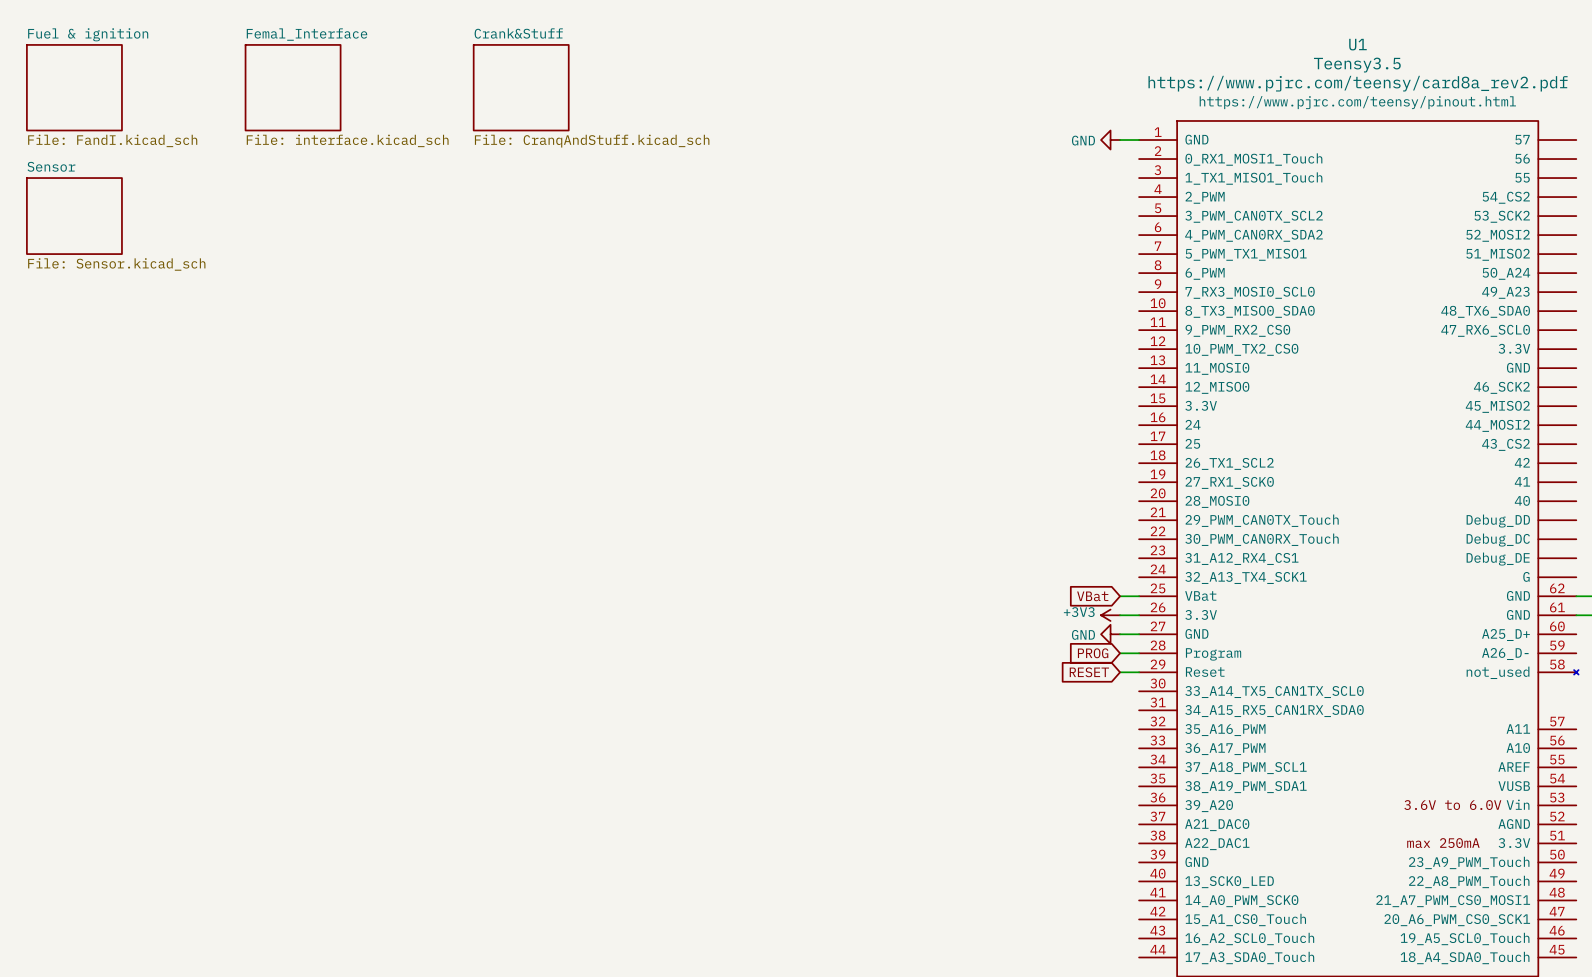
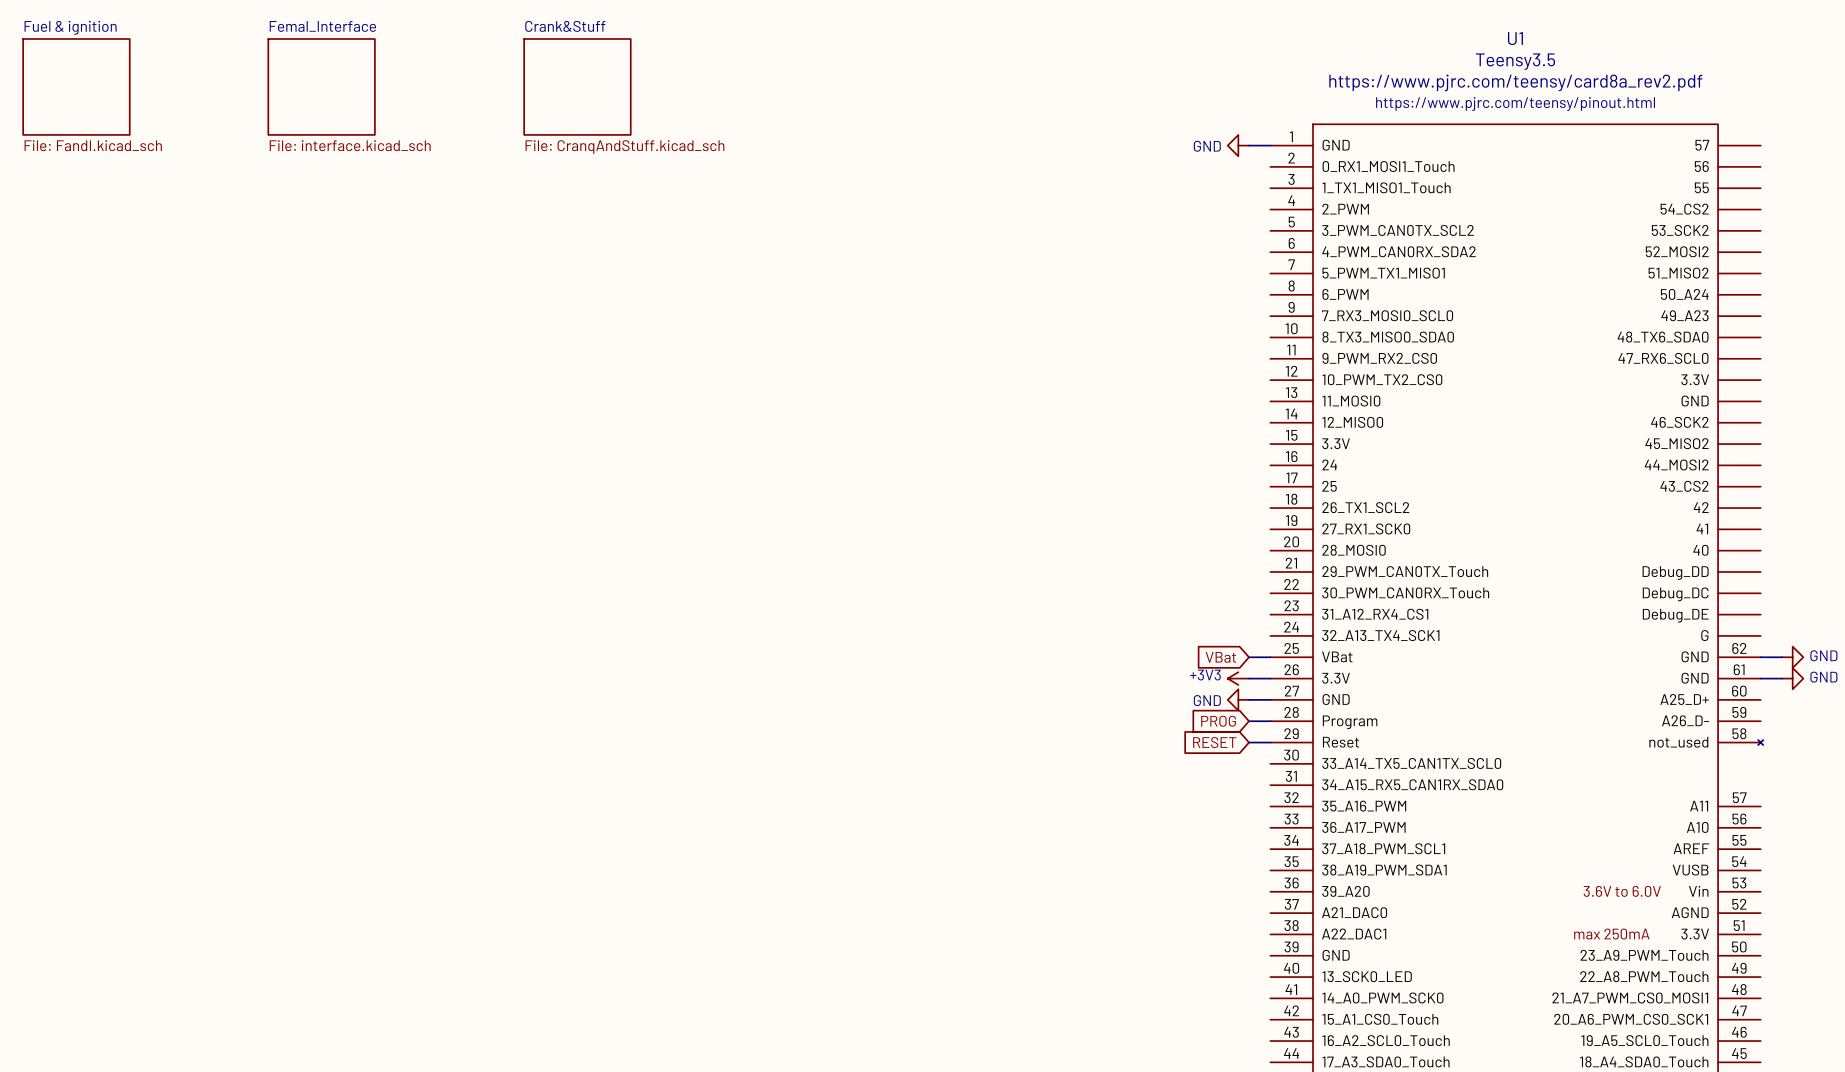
sheet Sensor: File: Sensor.kicad_sch (74, 216) -> none

